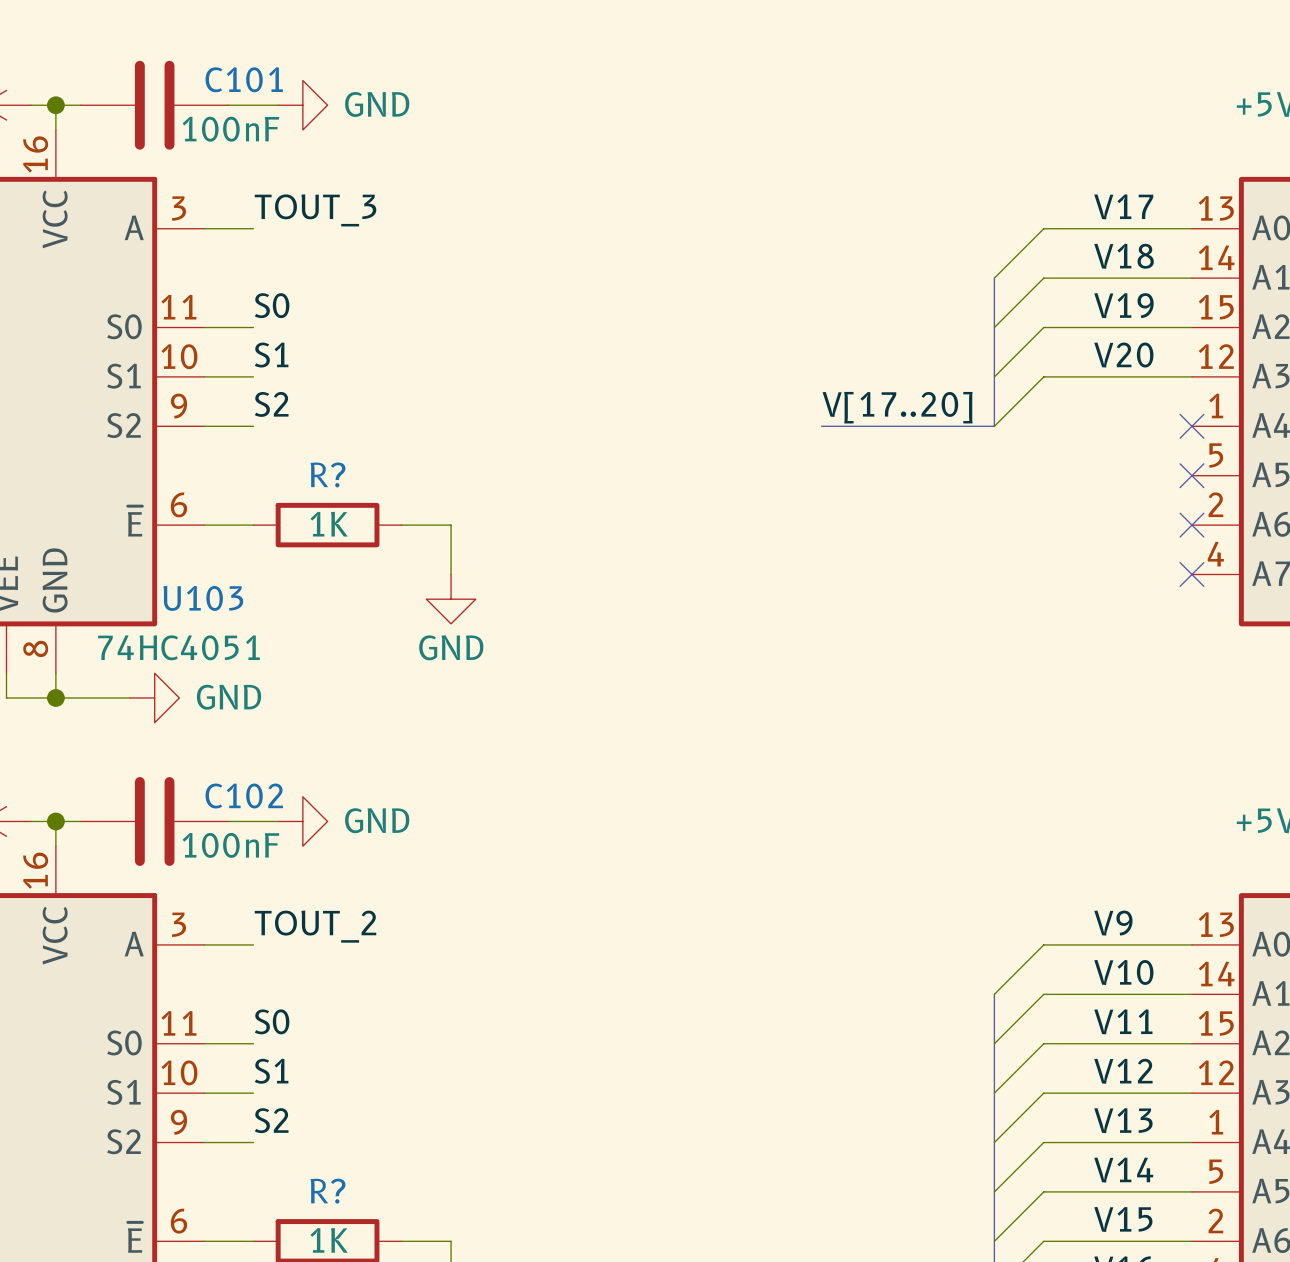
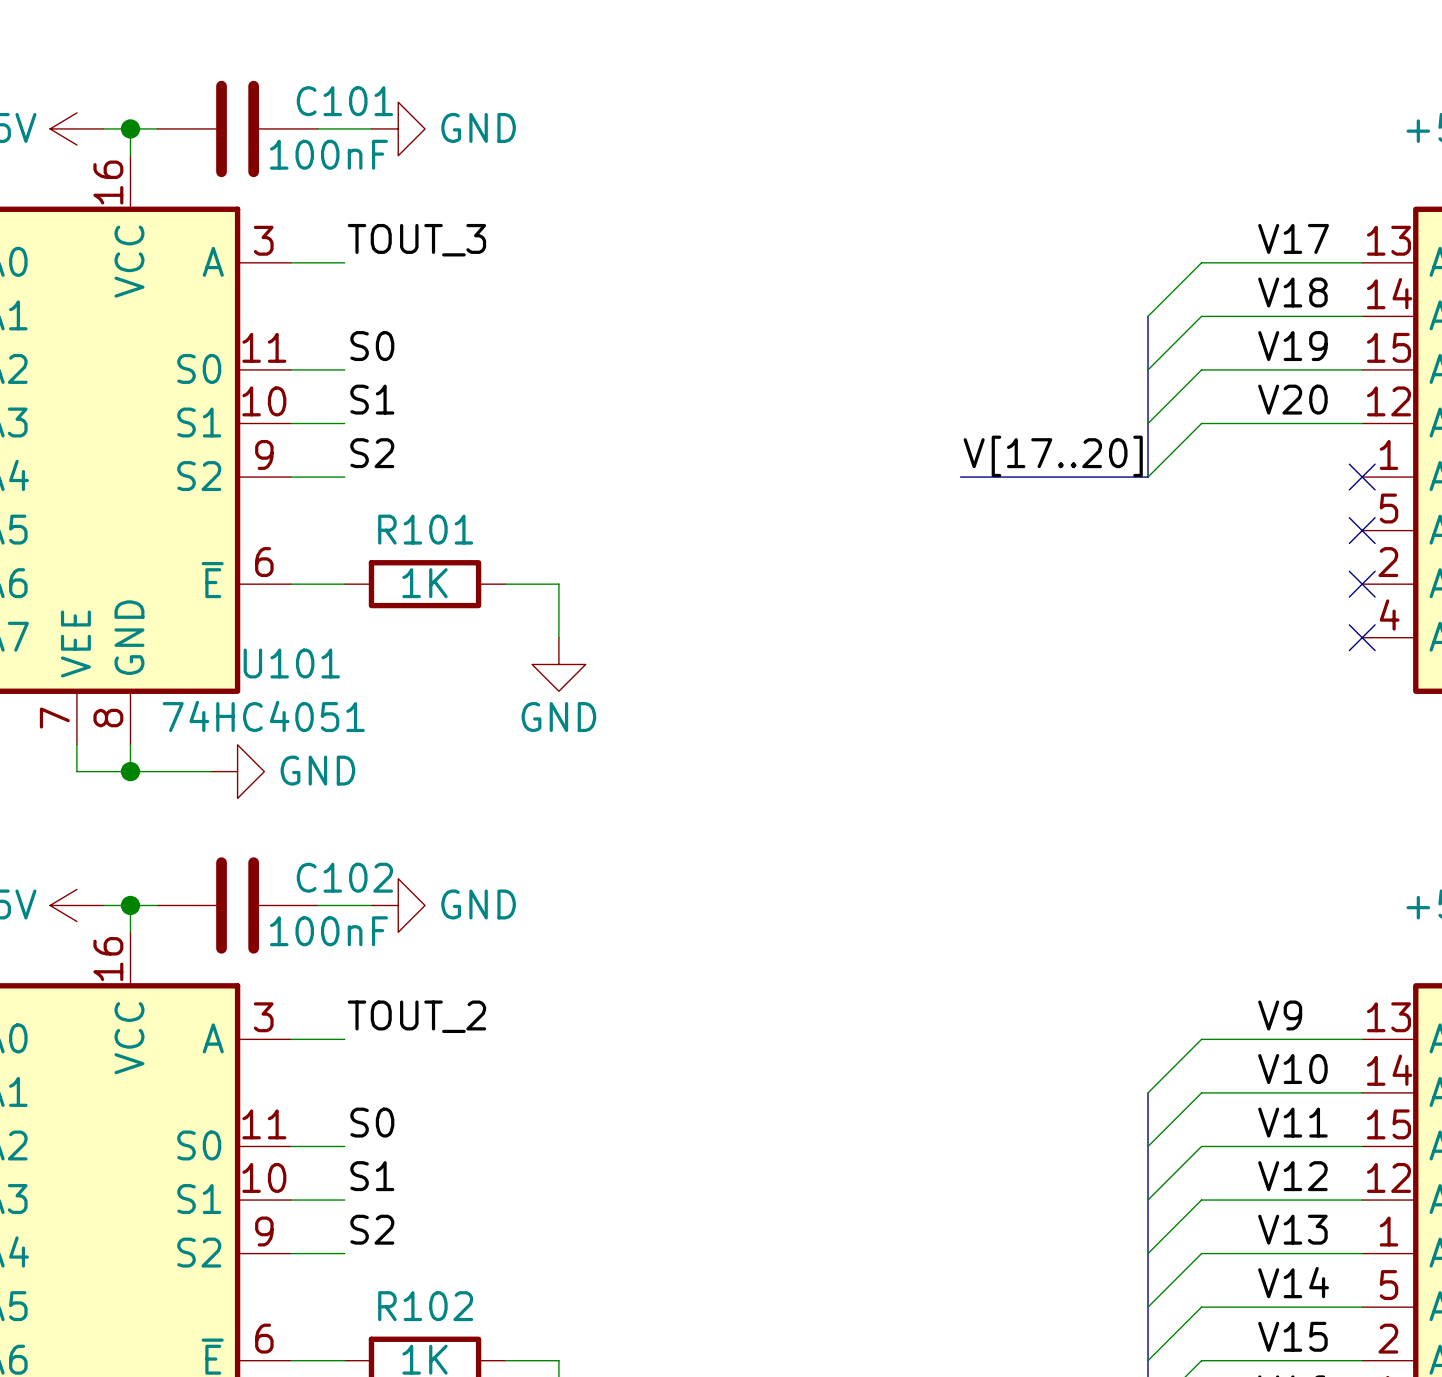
R? name: R? (328, 474) -> R101 (425, 529)
U103 name: U103 (203, 598) -> U101 (291, 663)
R? name: R? (328, 1191) -> R102 (425, 1306)

